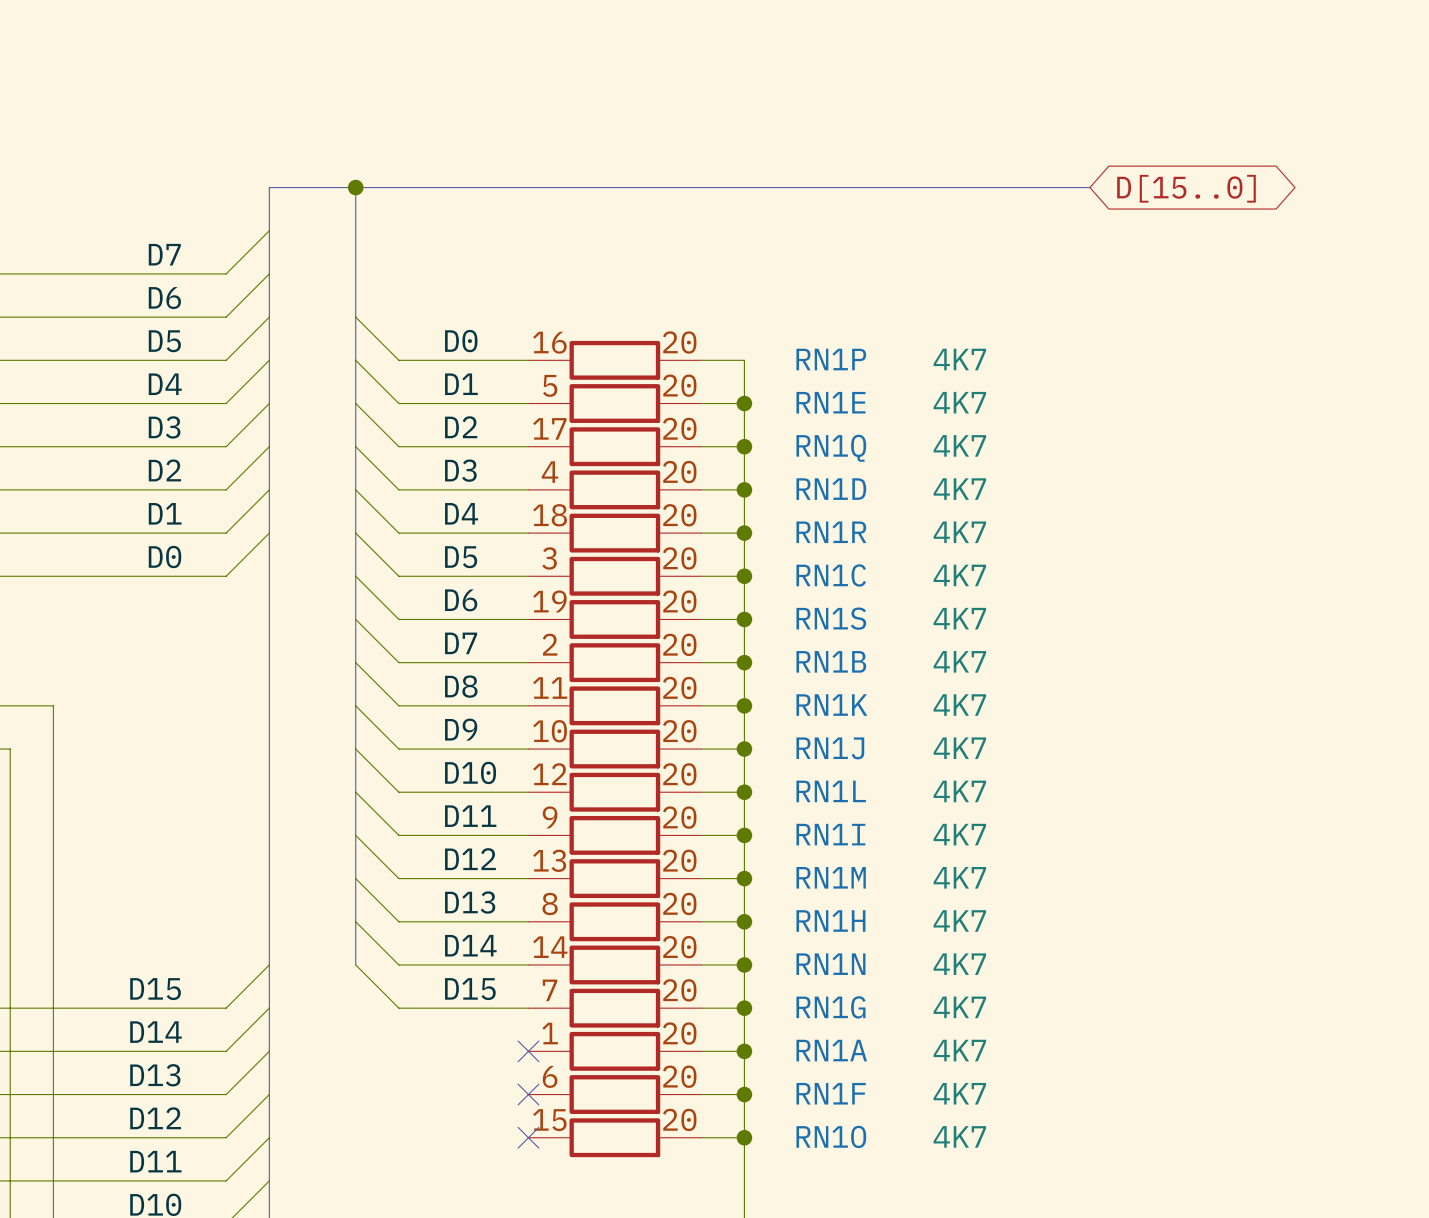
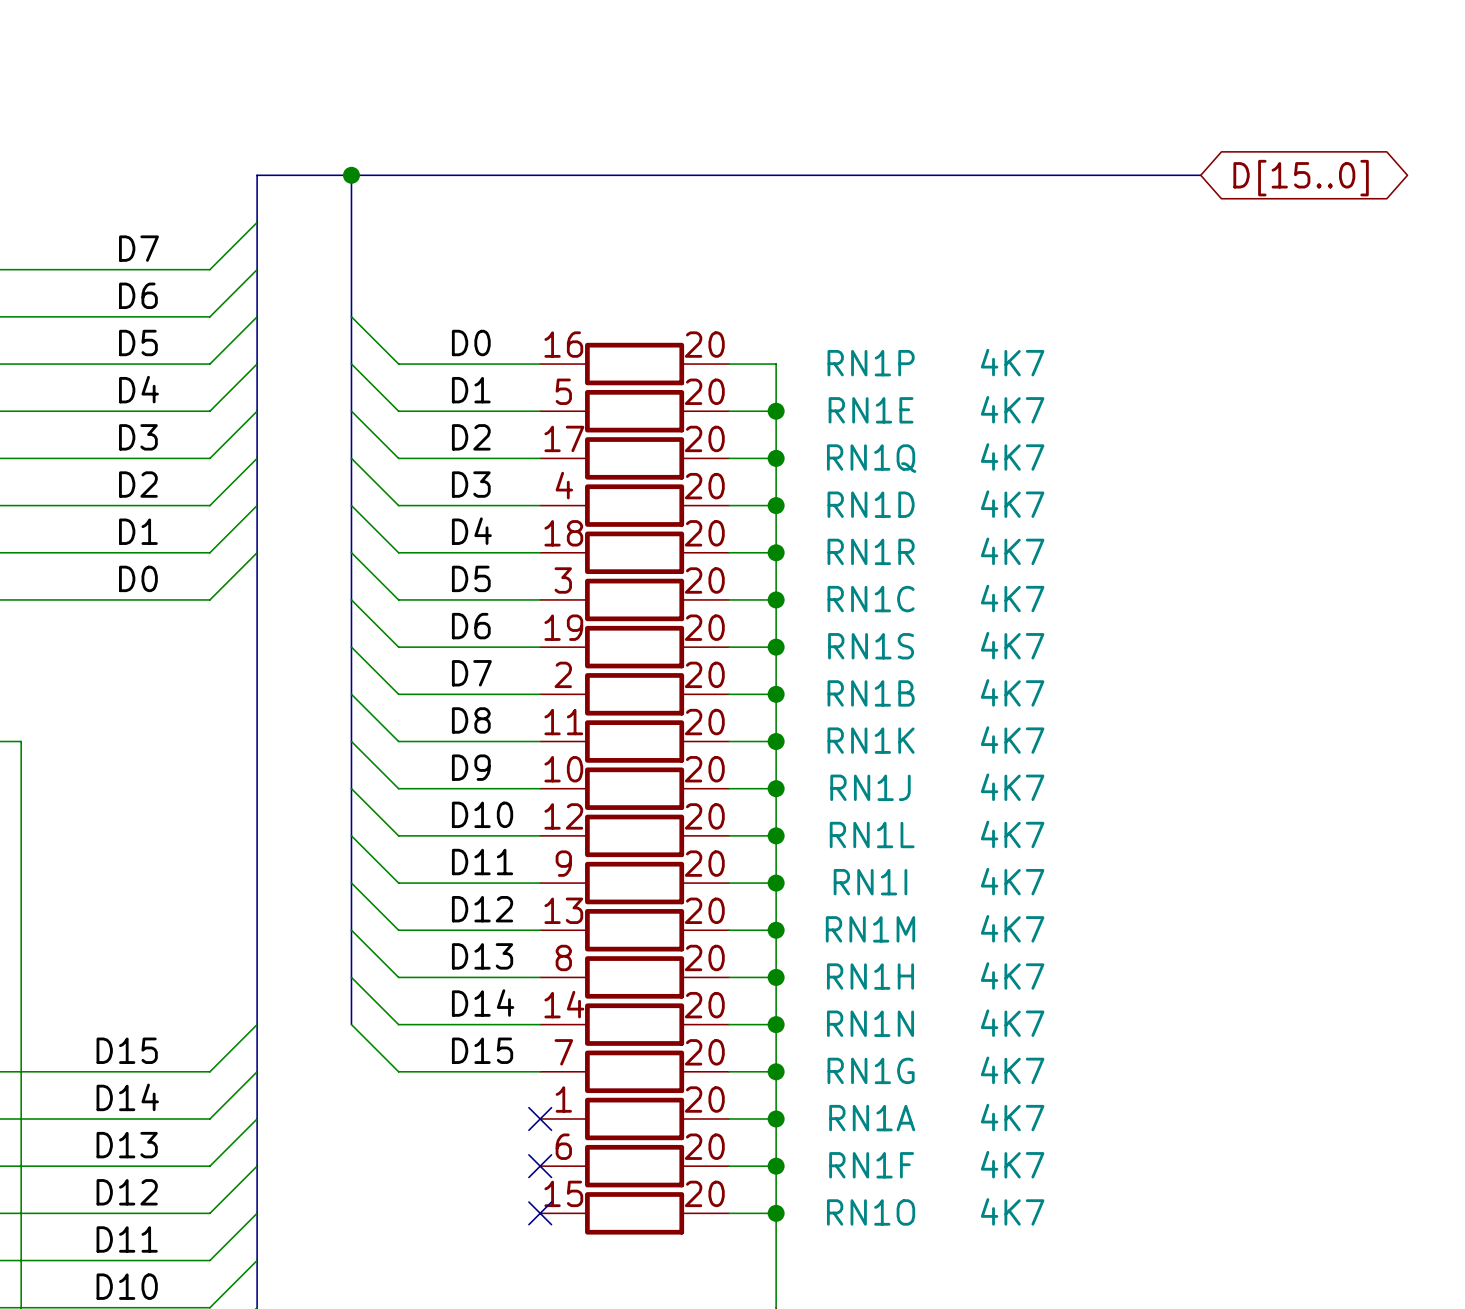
bus: none -> (1153, 175) (1200, 175)
global label position: D[15..0] (1186, 188) -> D[15..0] (1301, 178)

